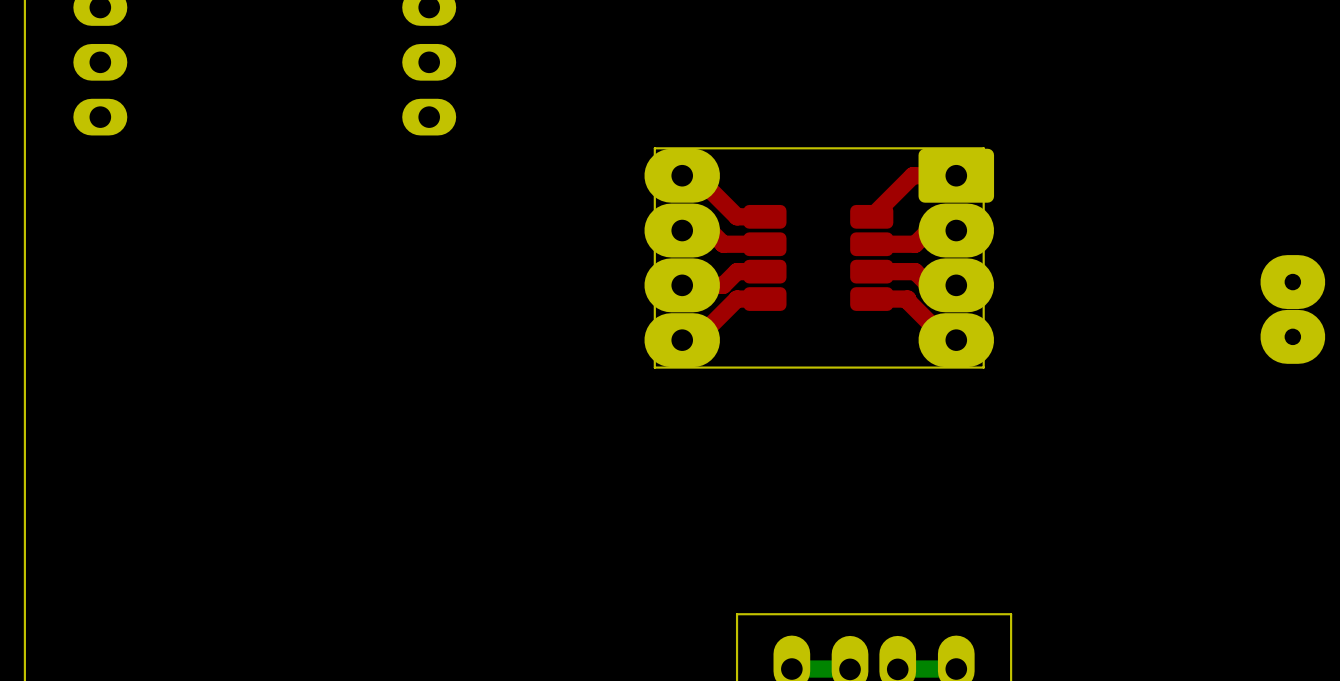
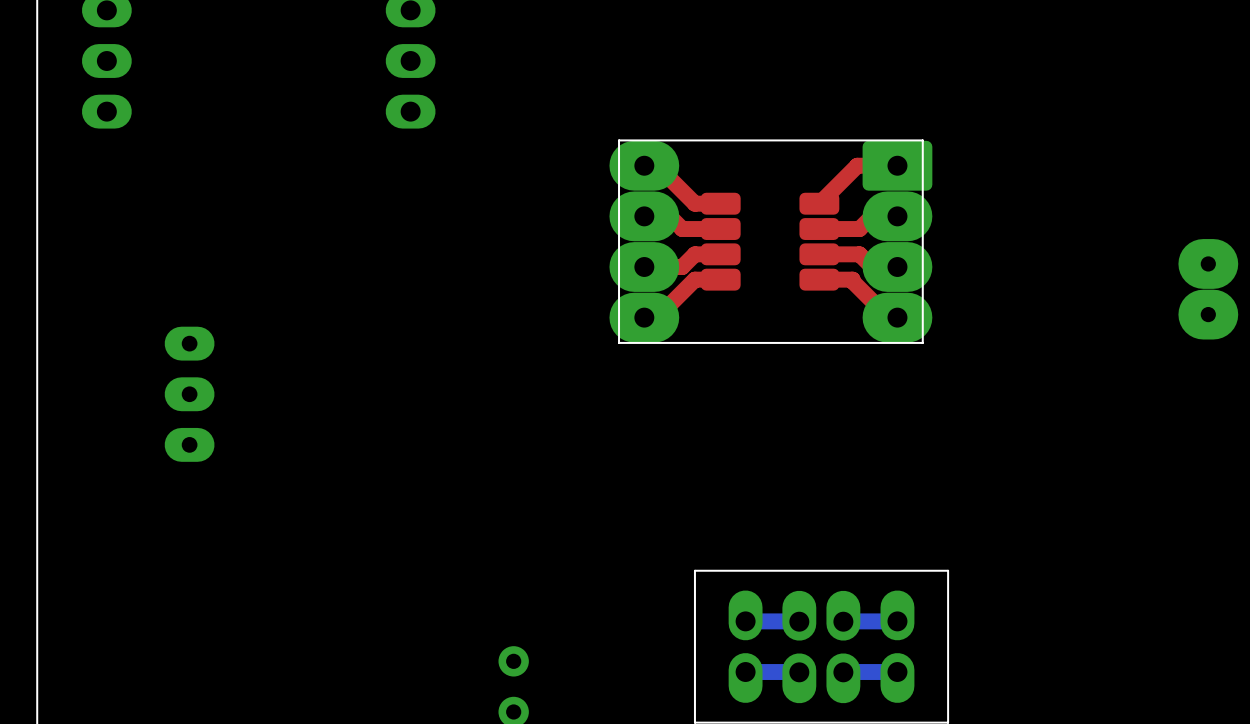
part: none -> (189, 394)

